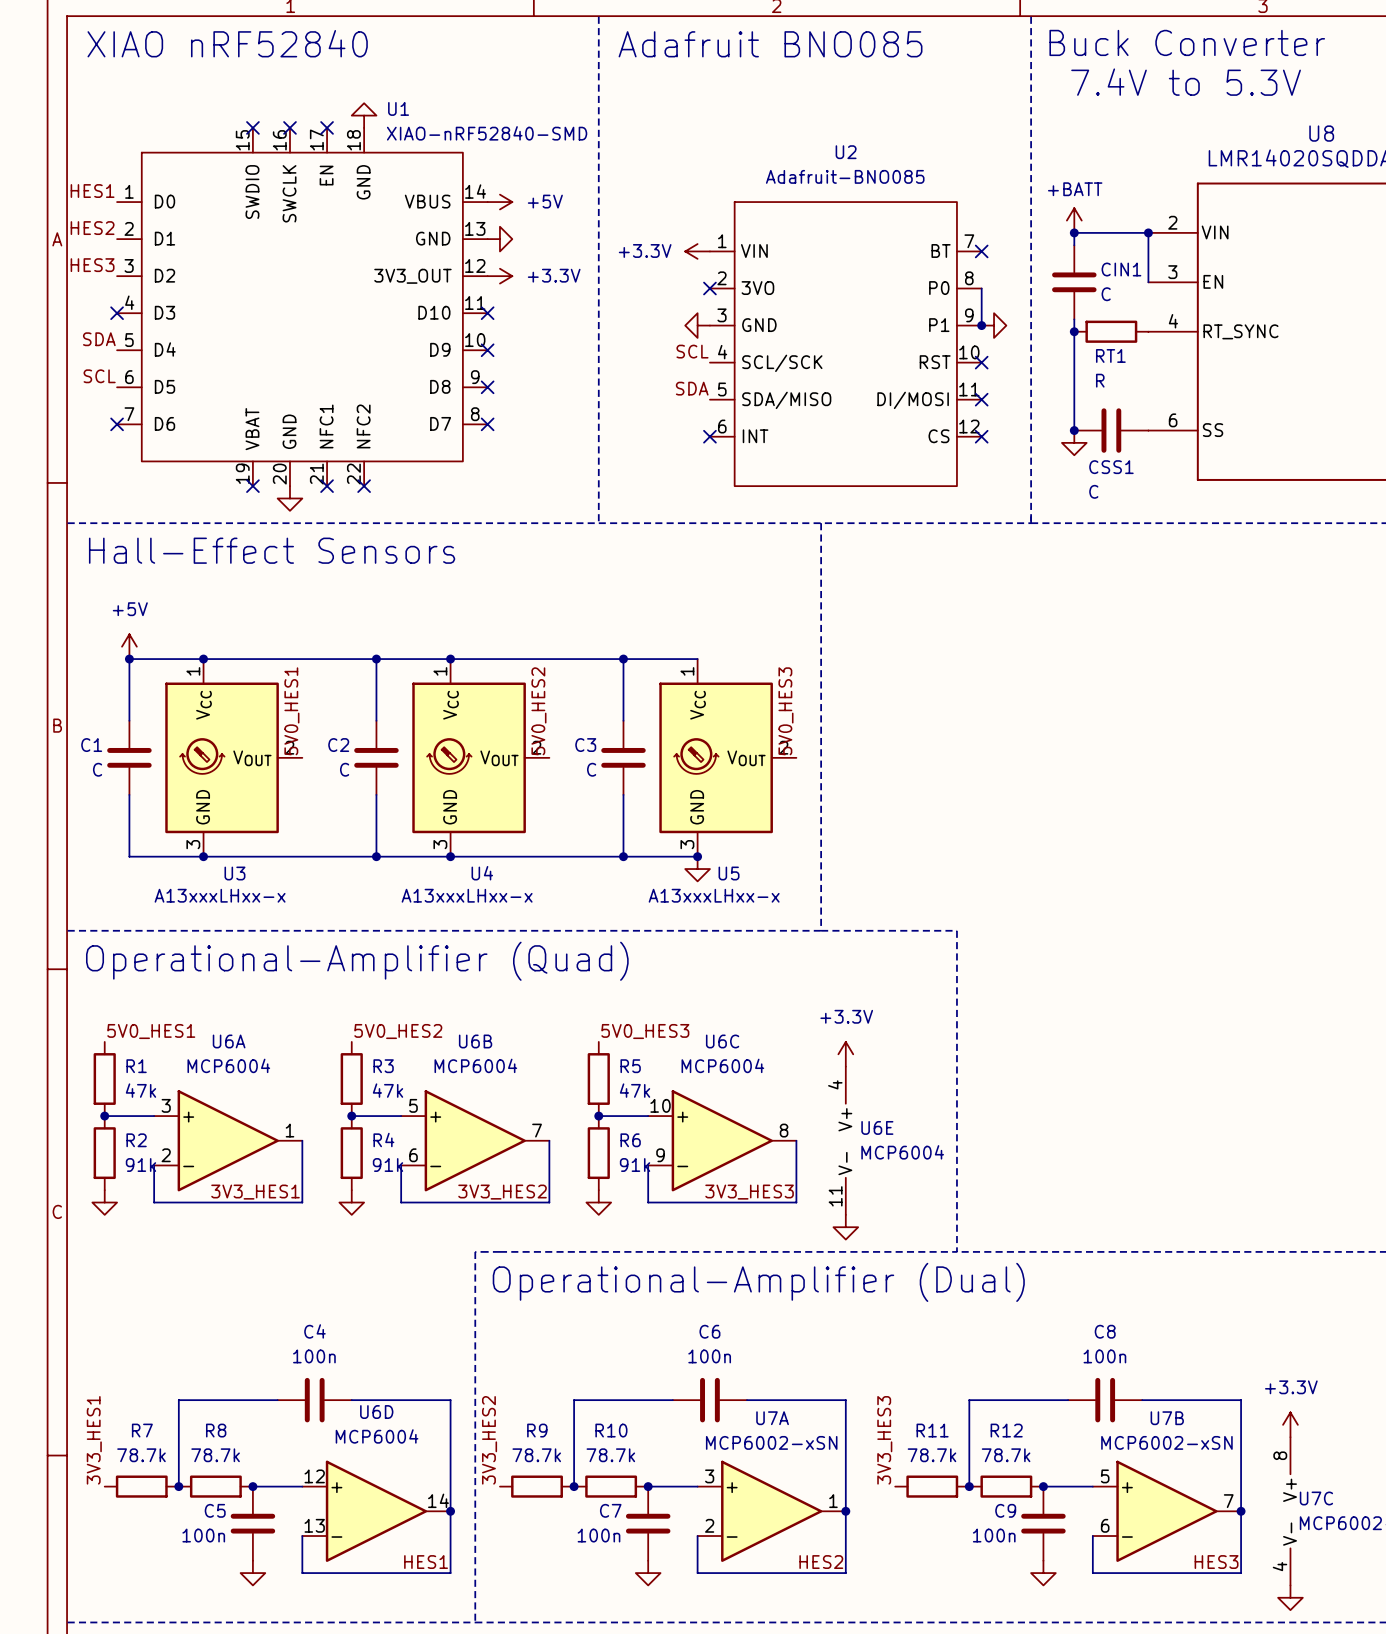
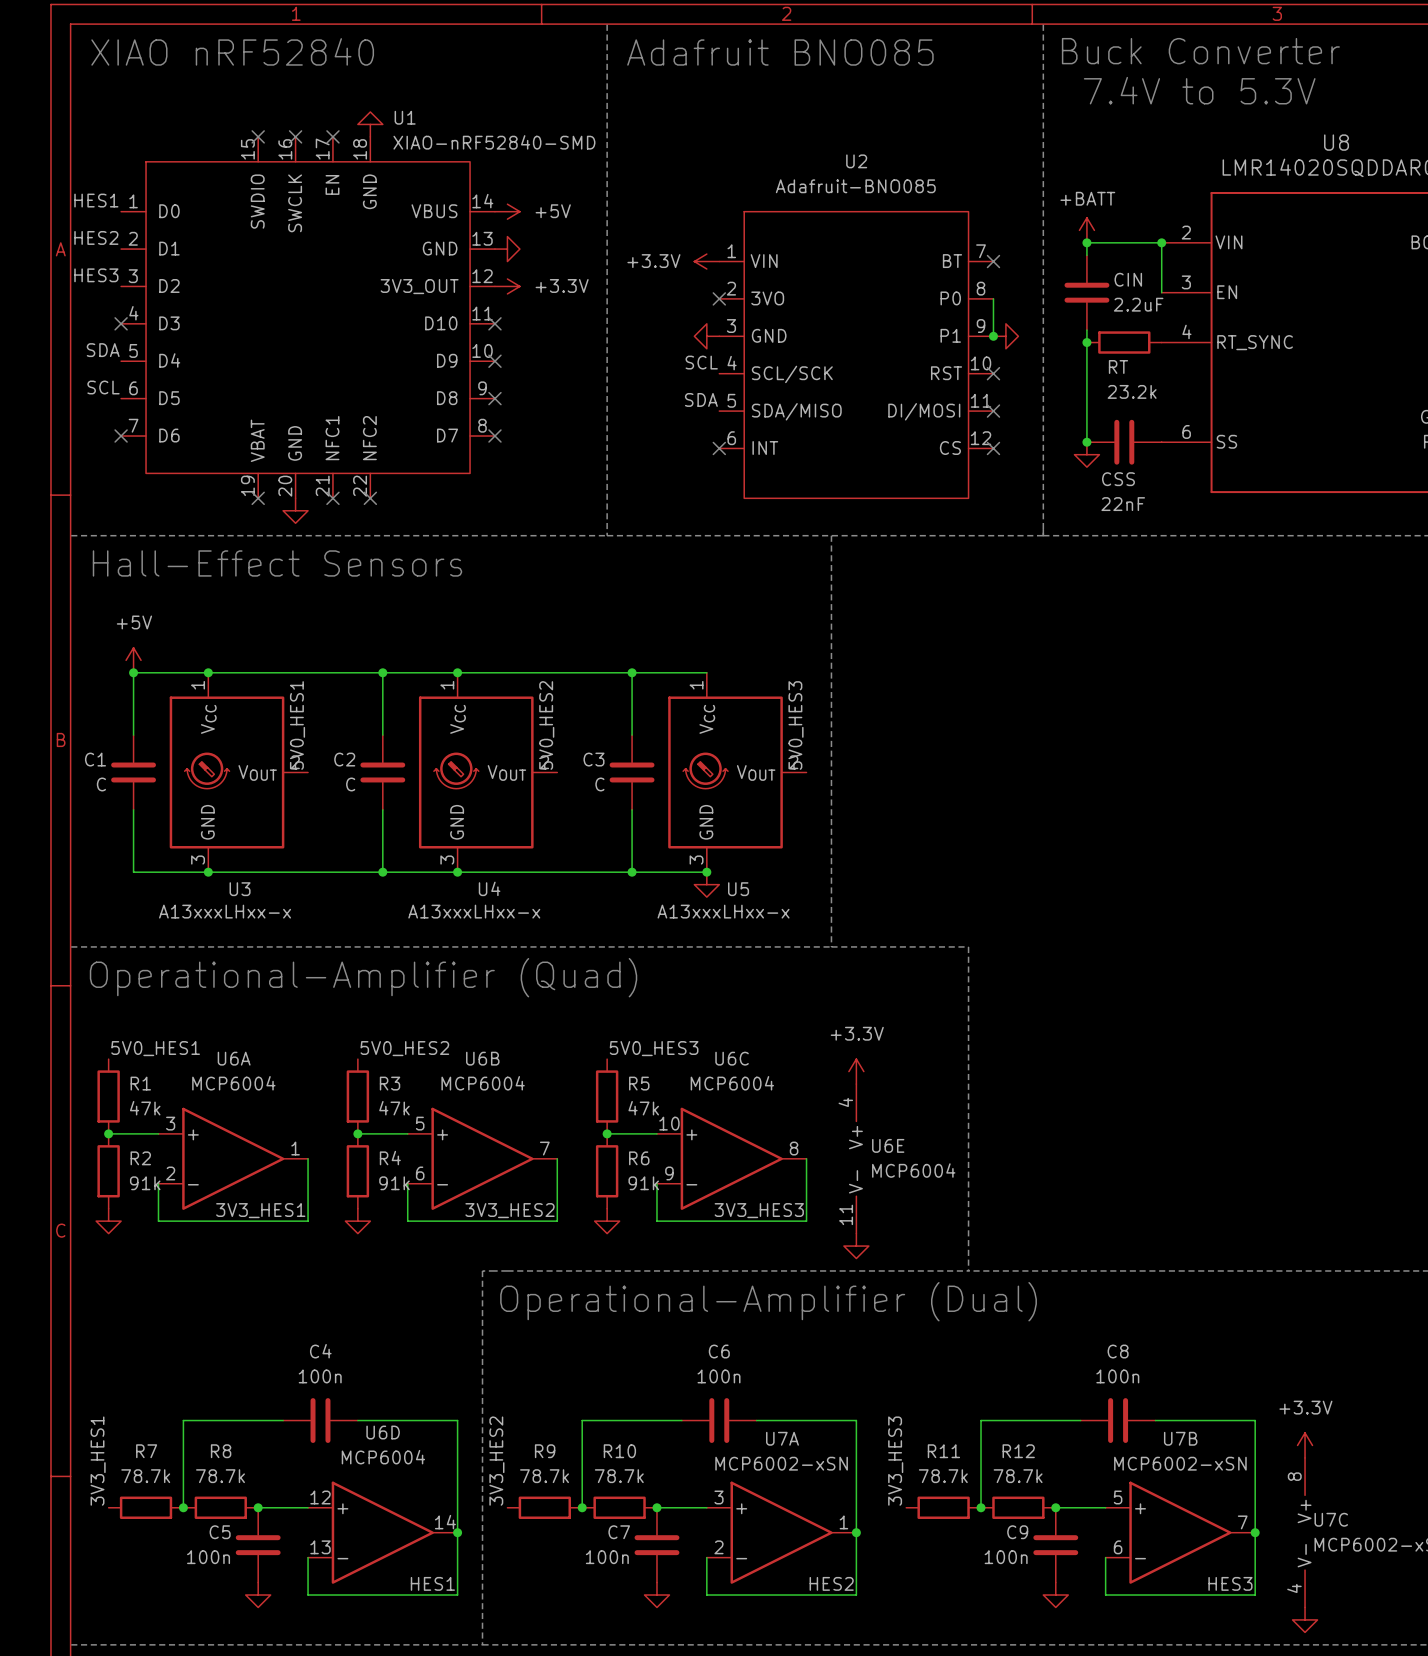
CIN1 name: CIN1 (1121, 269) -> CIN (1128, 279)
CIN1 value: C (1106, 294) -> 2.2uF (1138, 304)
RT1 name: RT1 (1110, 355) -> RT (1118, 366)
RT1 value: R (1100, 380) -> 23.2k (1132, 391)
CSS1 name: CSS1 (1111, 467) -> CSS (1118, 479)
CSS1 value: C (1093, 491) -> 22nF (1123, 504)

